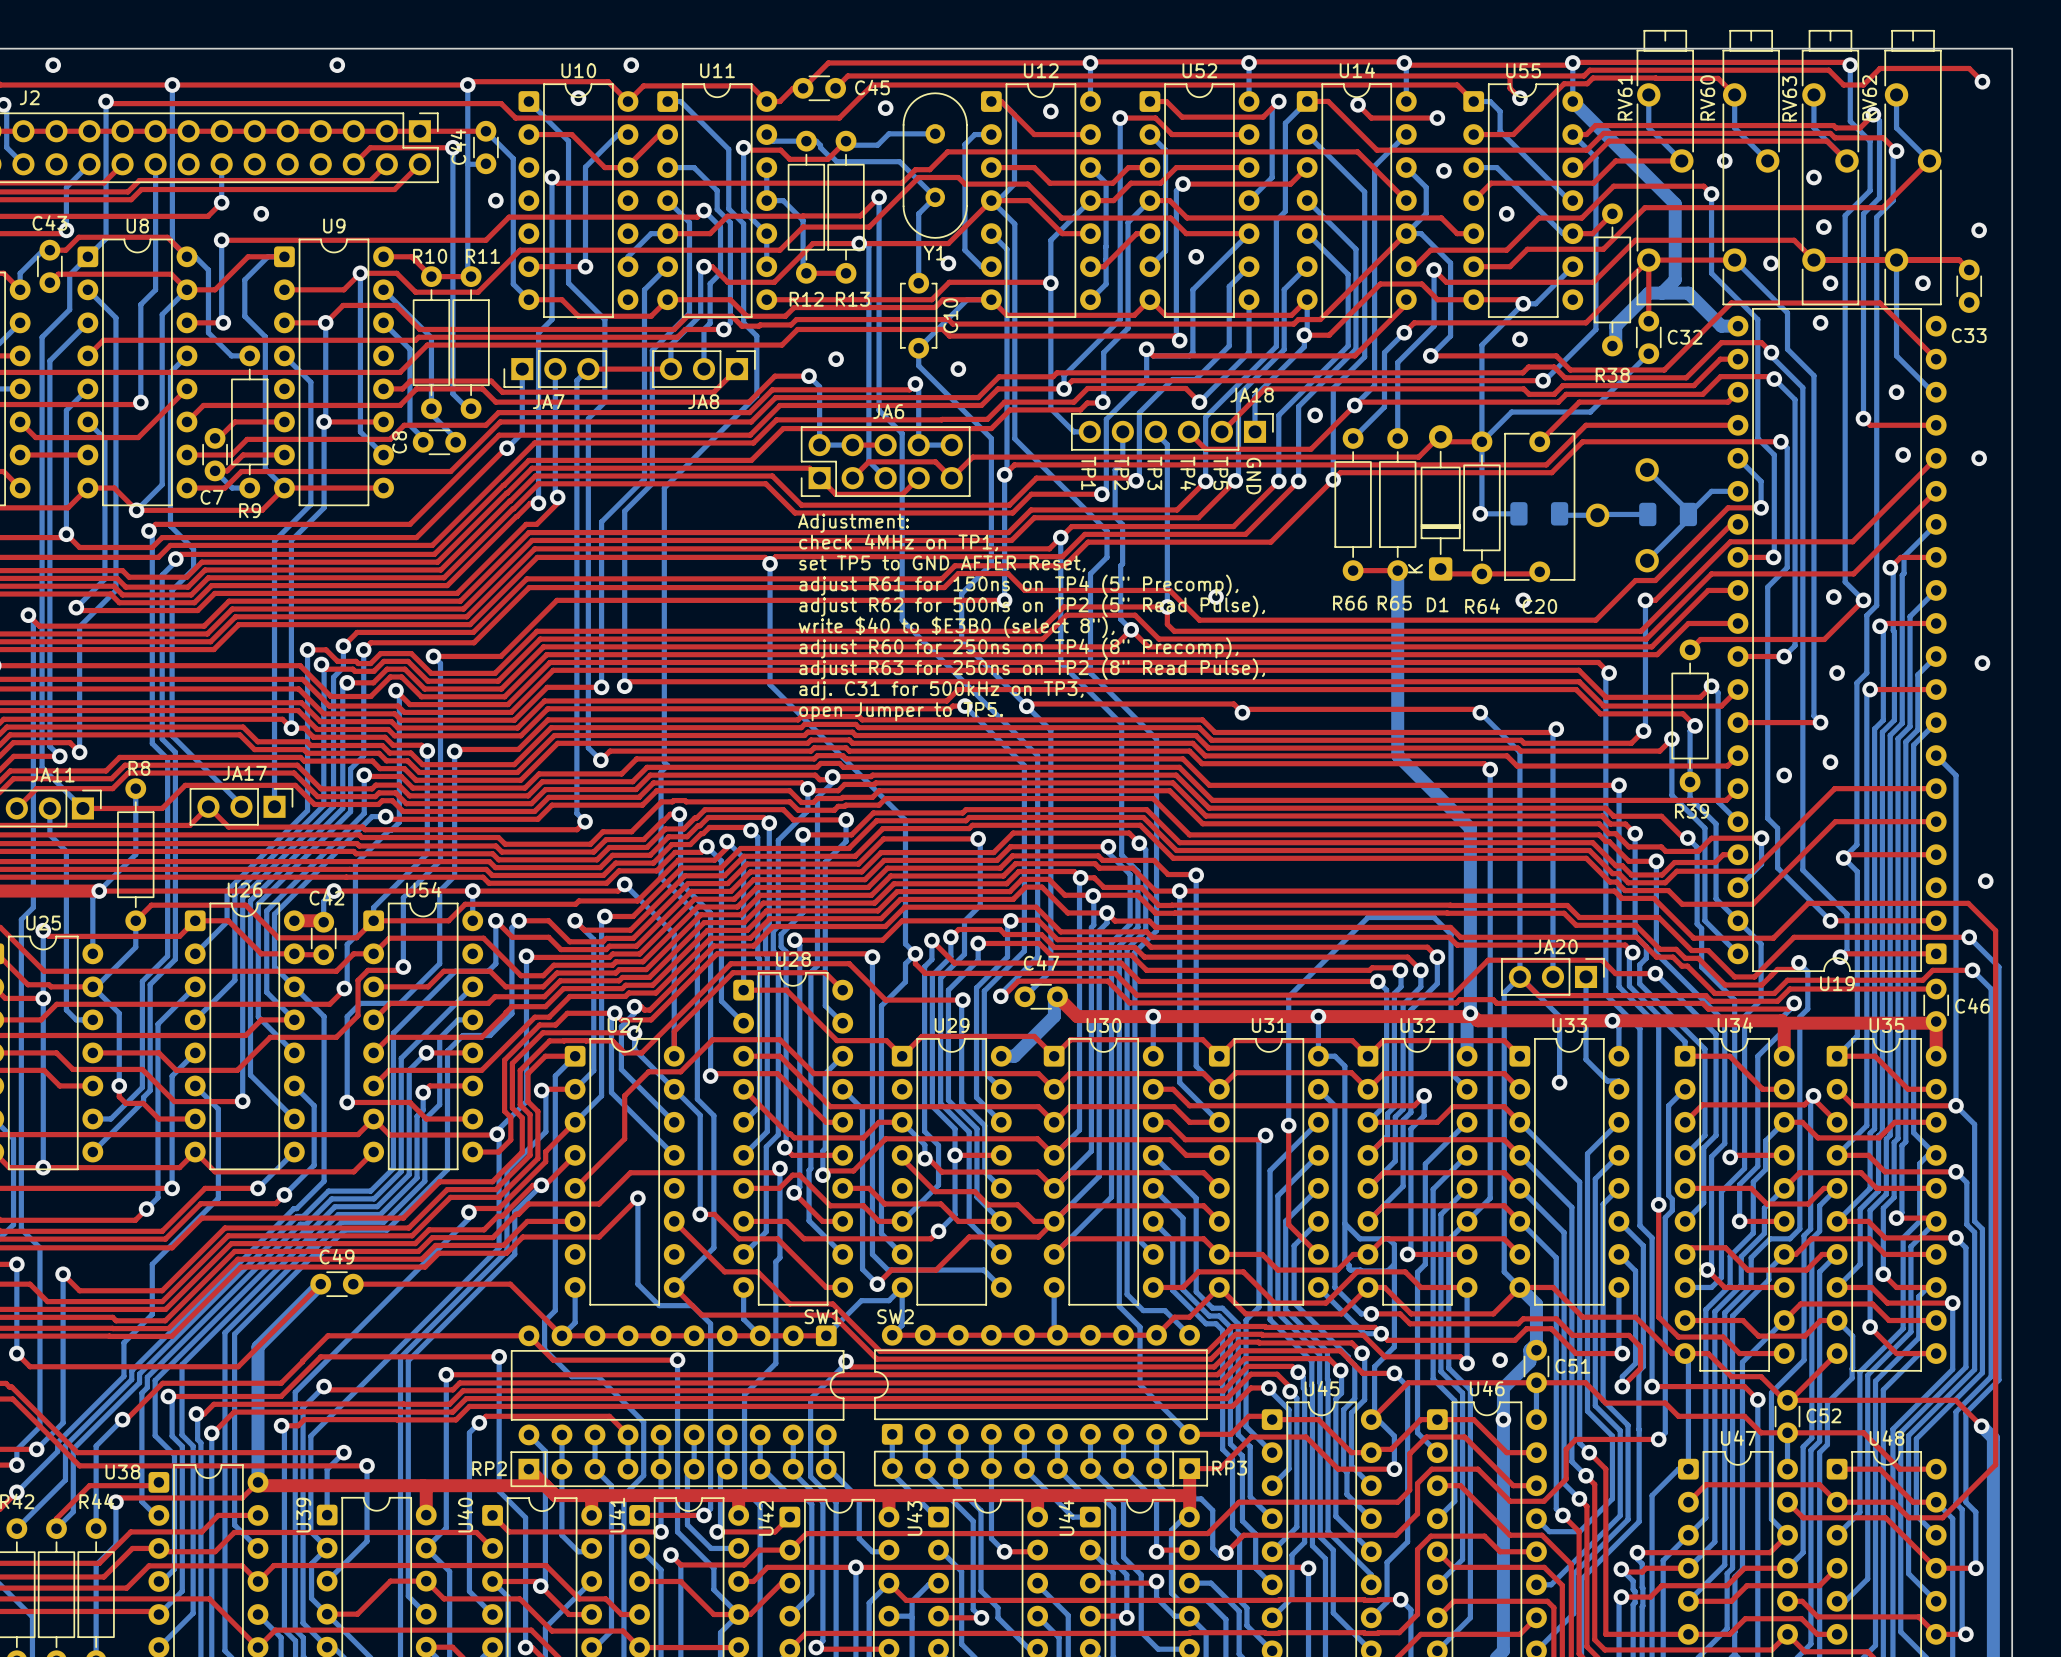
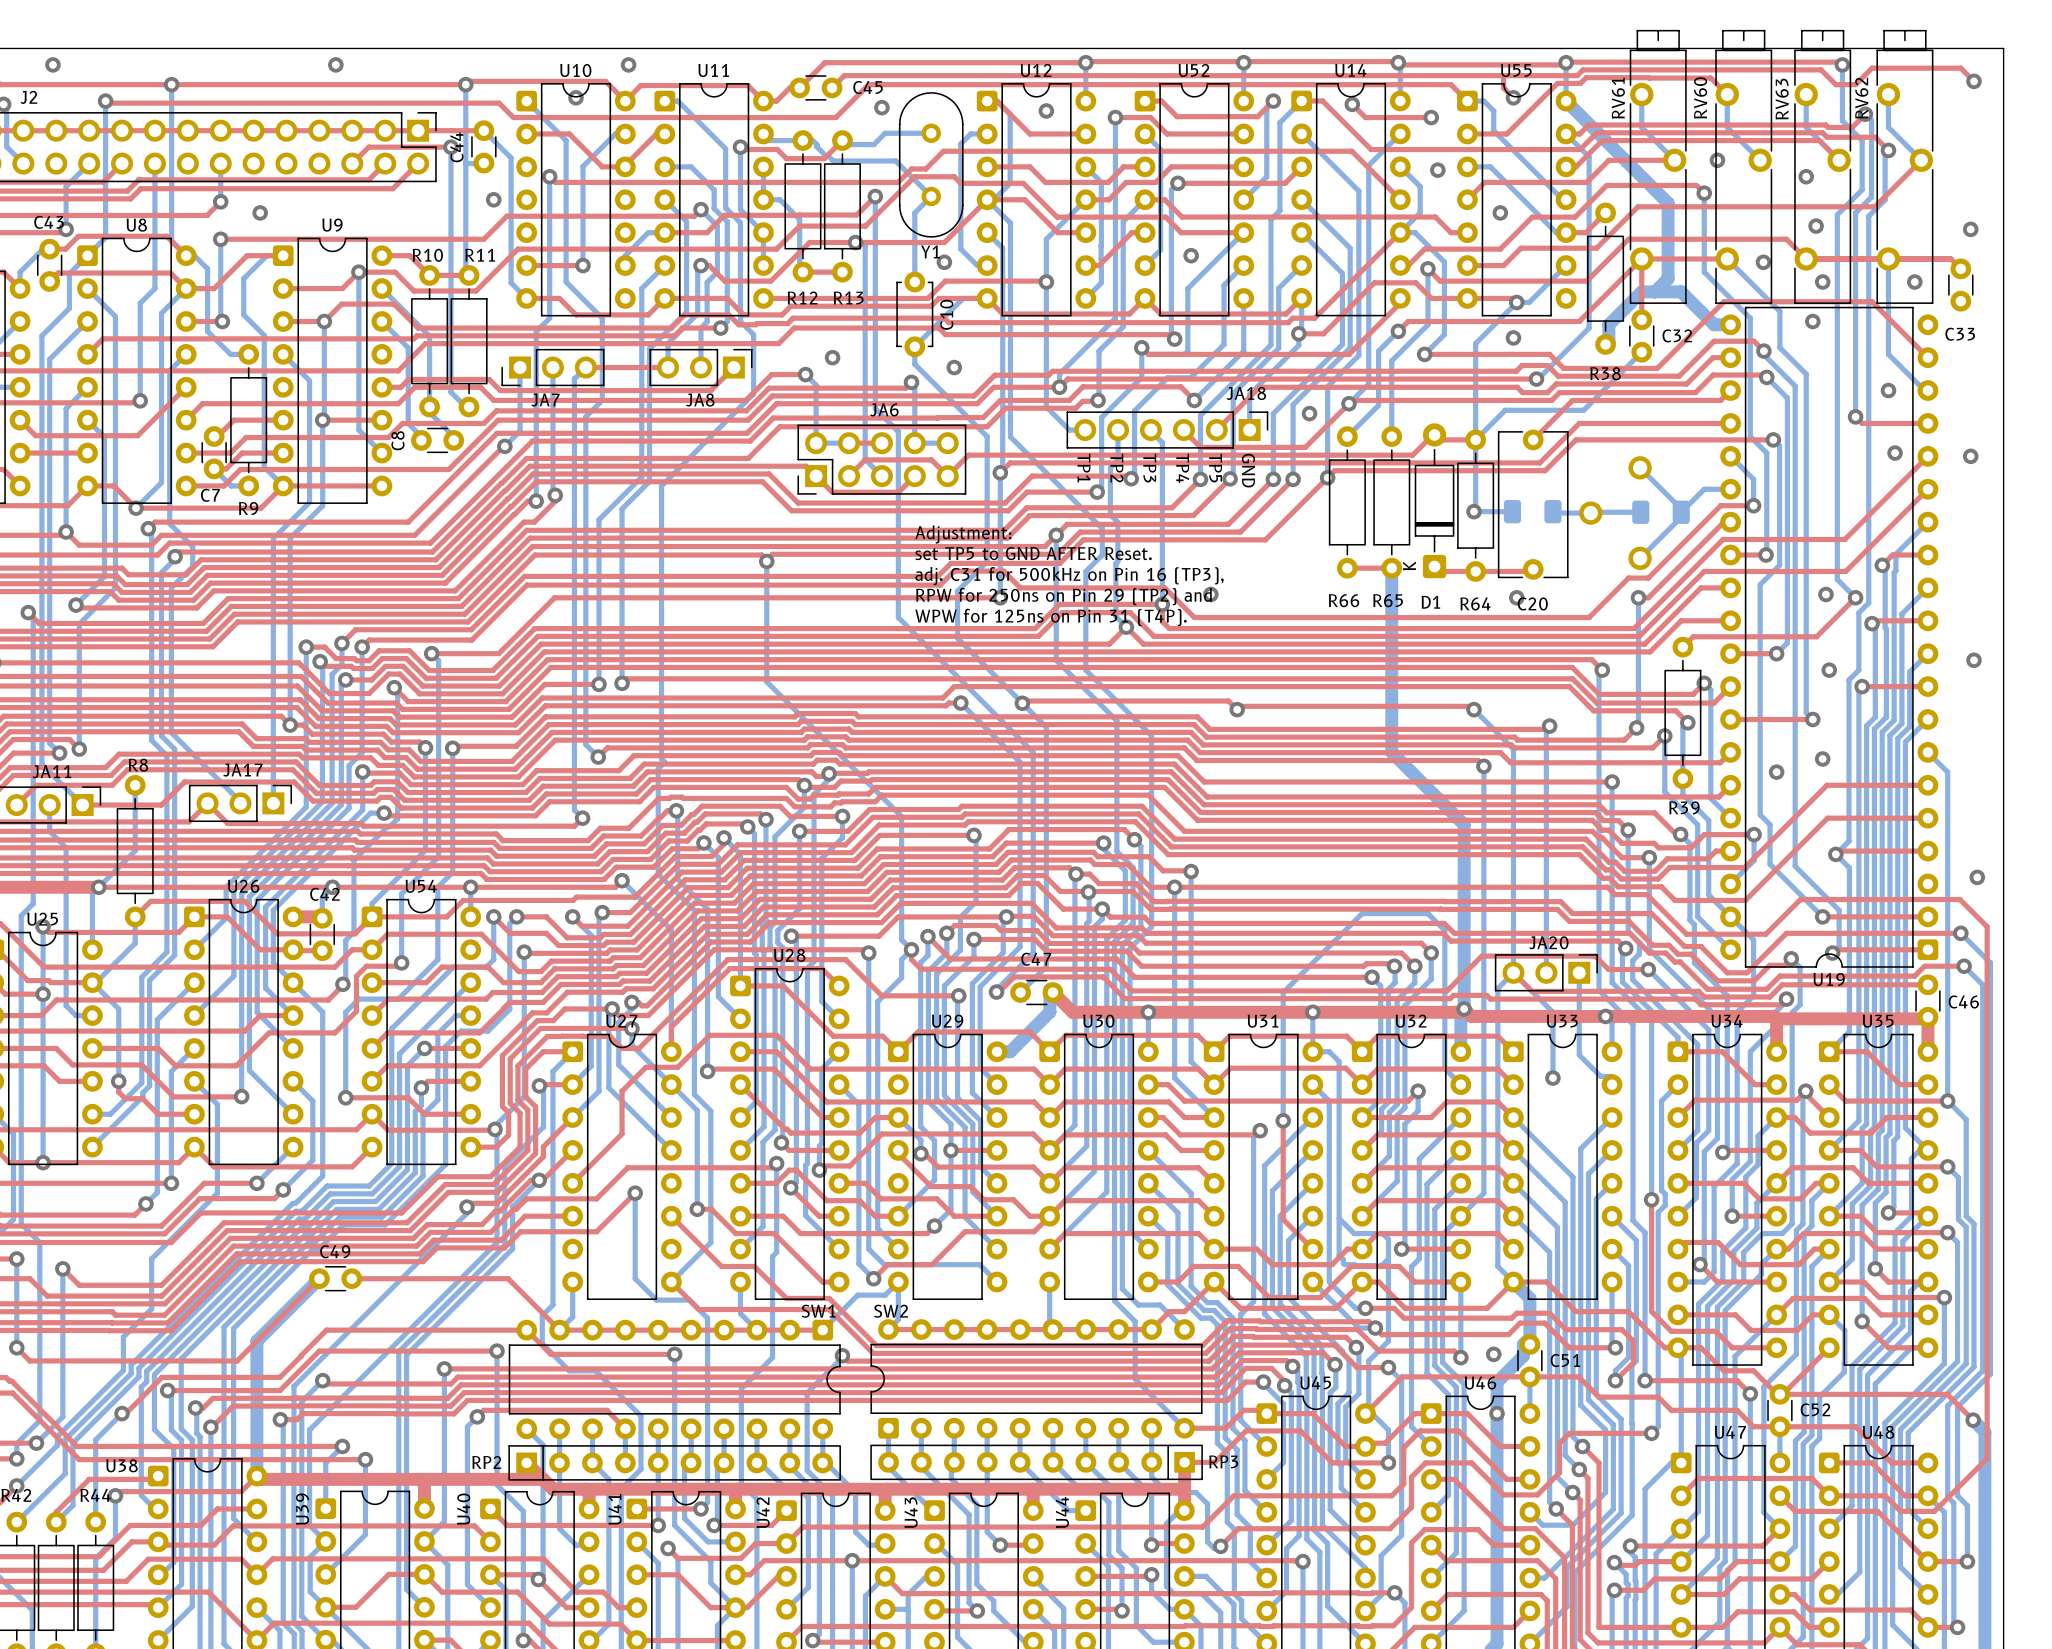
text position: Adjustment: (853, 523) -> Adjustment: (963, 534)
text: check 4MHz on TP1, (898, 542) -> none
text: set TP5 to GND AFTER Reset, (942, 563) -> set TP5 to GND AFTER Reset. (1033, 553)
text: none -> adj. C31 for 500kHz on Pin 16 (TP3), (1069, 576)
text: adjust R61 for 150ns on TP4 (5" Precomp), (1018, 585) -> none
text: none -> RPW for 250ns on Pin 29 (TP2) and (1064, 596)
text: adjust R62 for 500ns on TP2 (5" Read Pulse), (1032, 606) -> none
text: none -> WPW for 125ns on Pin 31 (T4P). (1051, 617)
text: write $40 to $E3B0 (select 8"), (956, 627) -> none
text: adjust R60 for 250ns on TP4 (8" Precomp), (1018, 648) -> none
text: adjust R63 for 250ns on TP2 (8" Read Pulse), (1032, 669) -> none
text: adj. C31 for 500kHz on TP3, (941, 690) -> none
text: open Jumper to TP5. (901, 711) -> none

